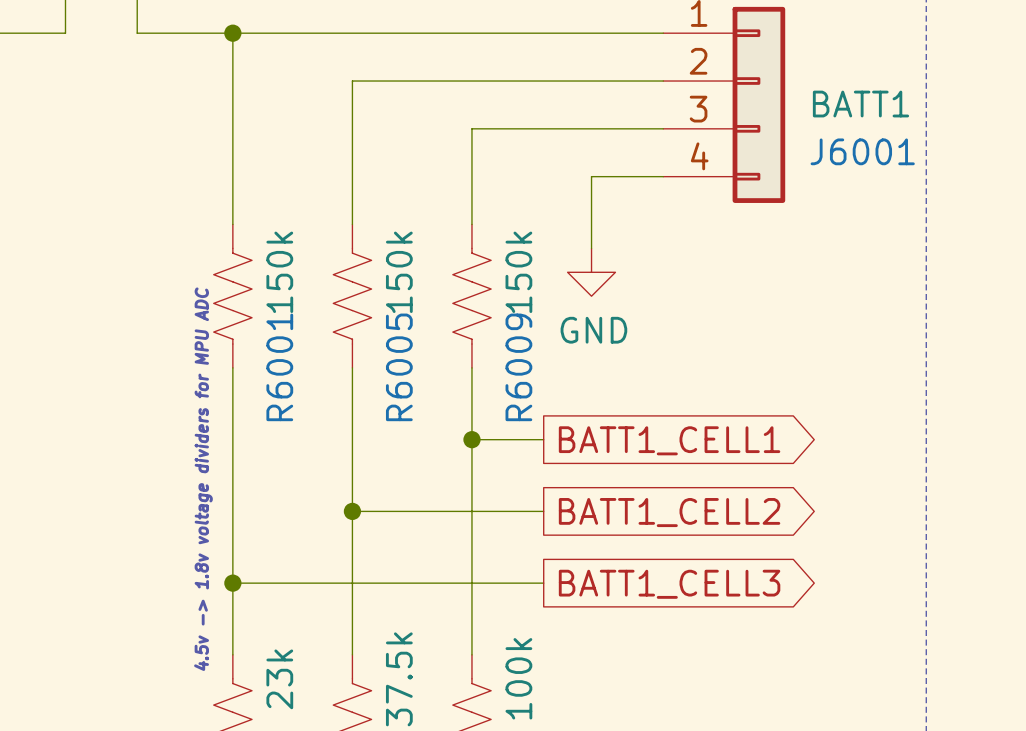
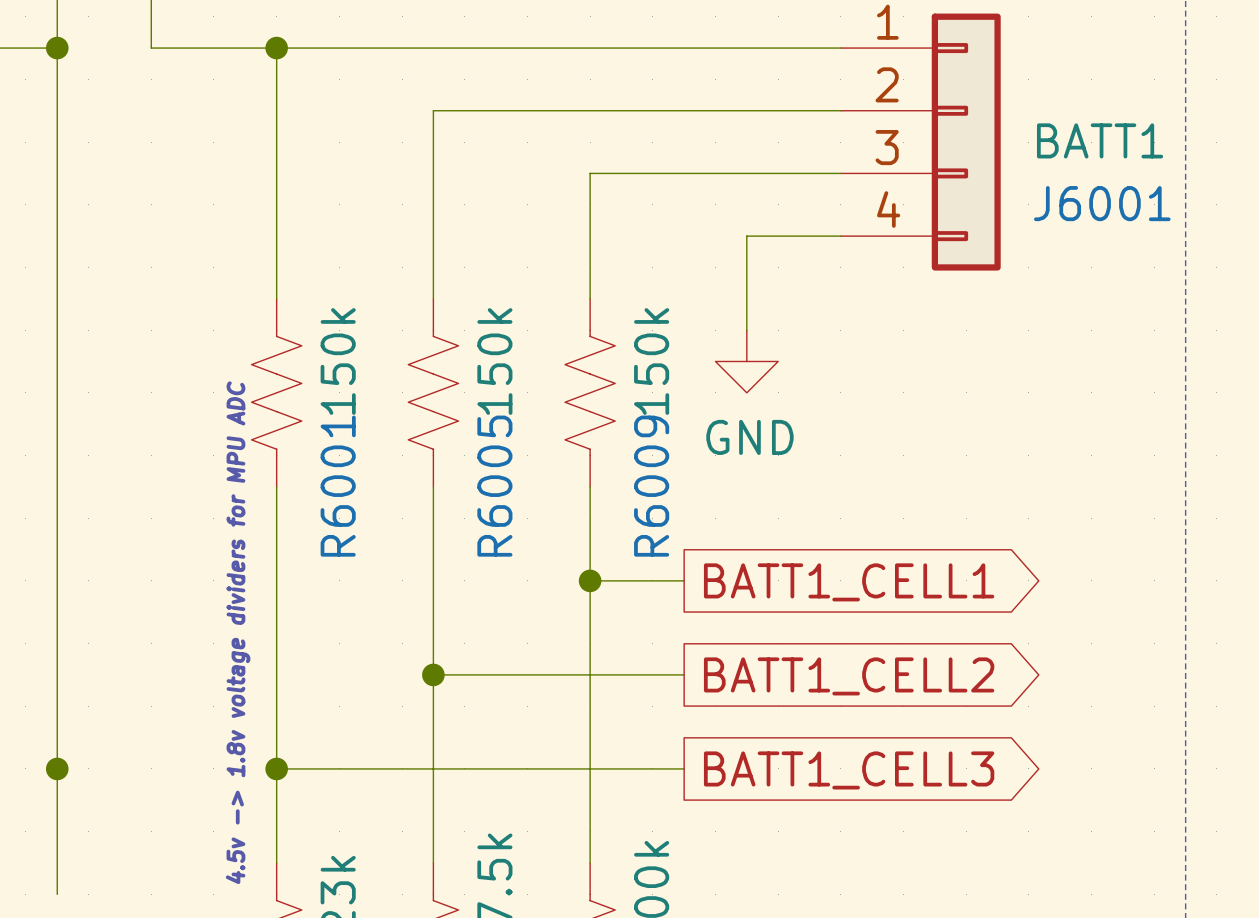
wire: none -> (57, 48) (57, 894)
junction: none -> (57, 48)
junction: none -> (57, 768)

